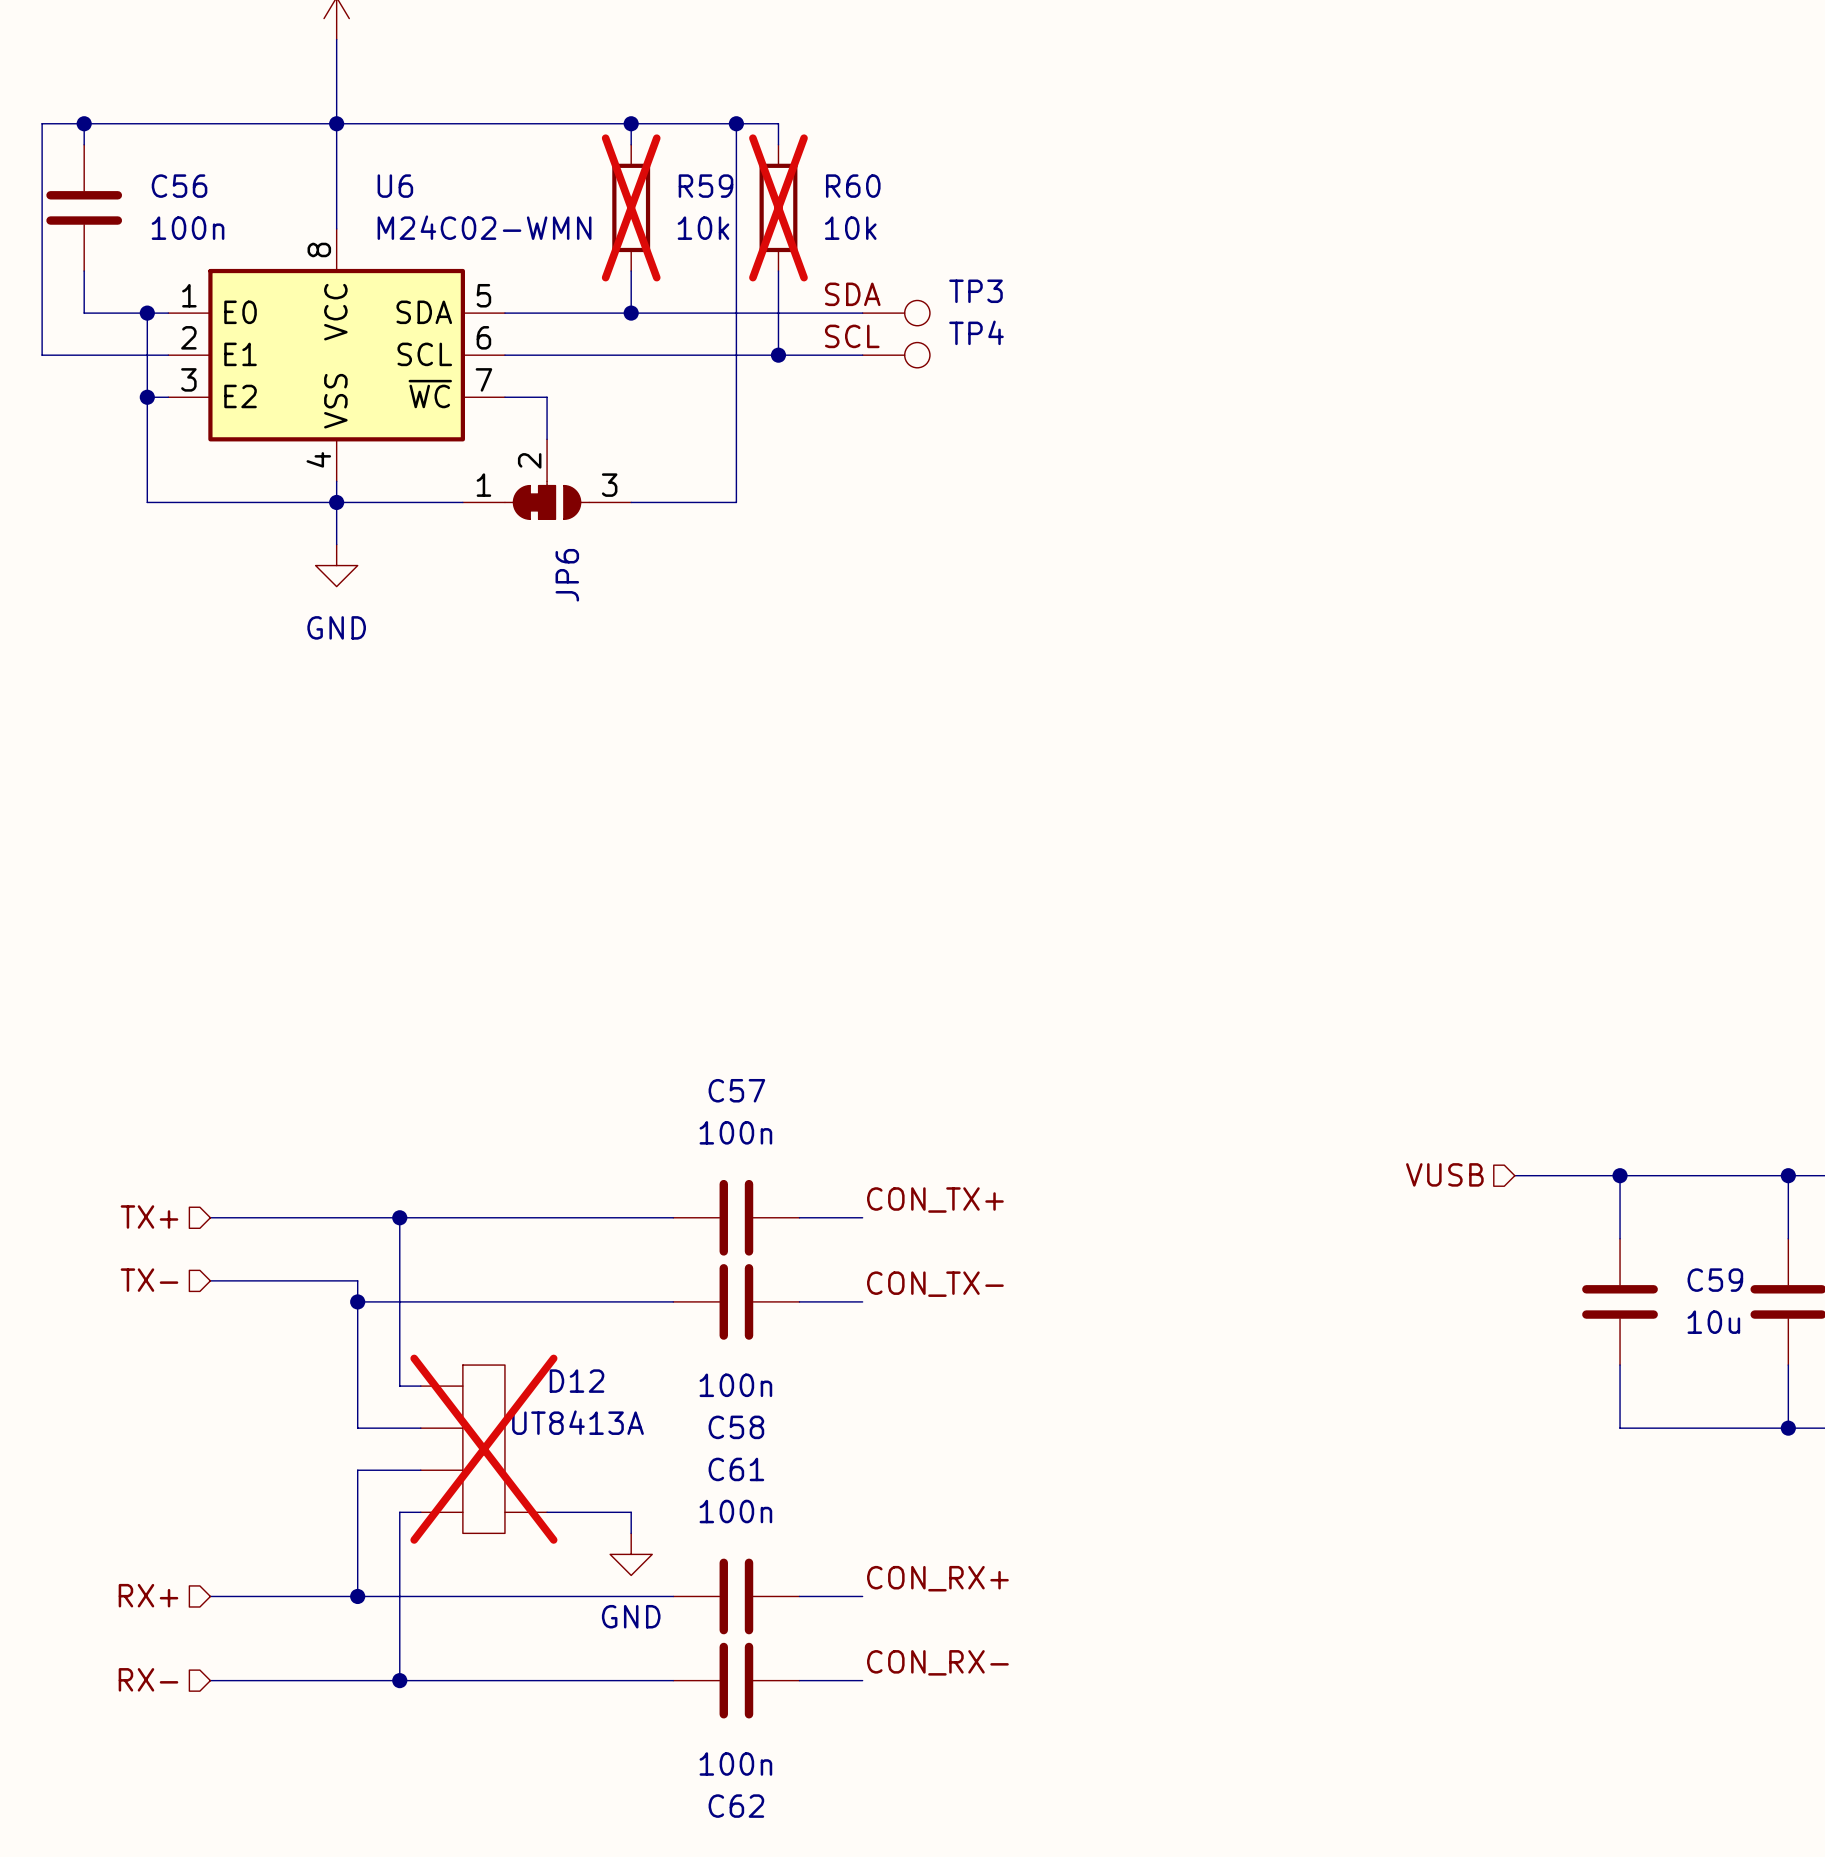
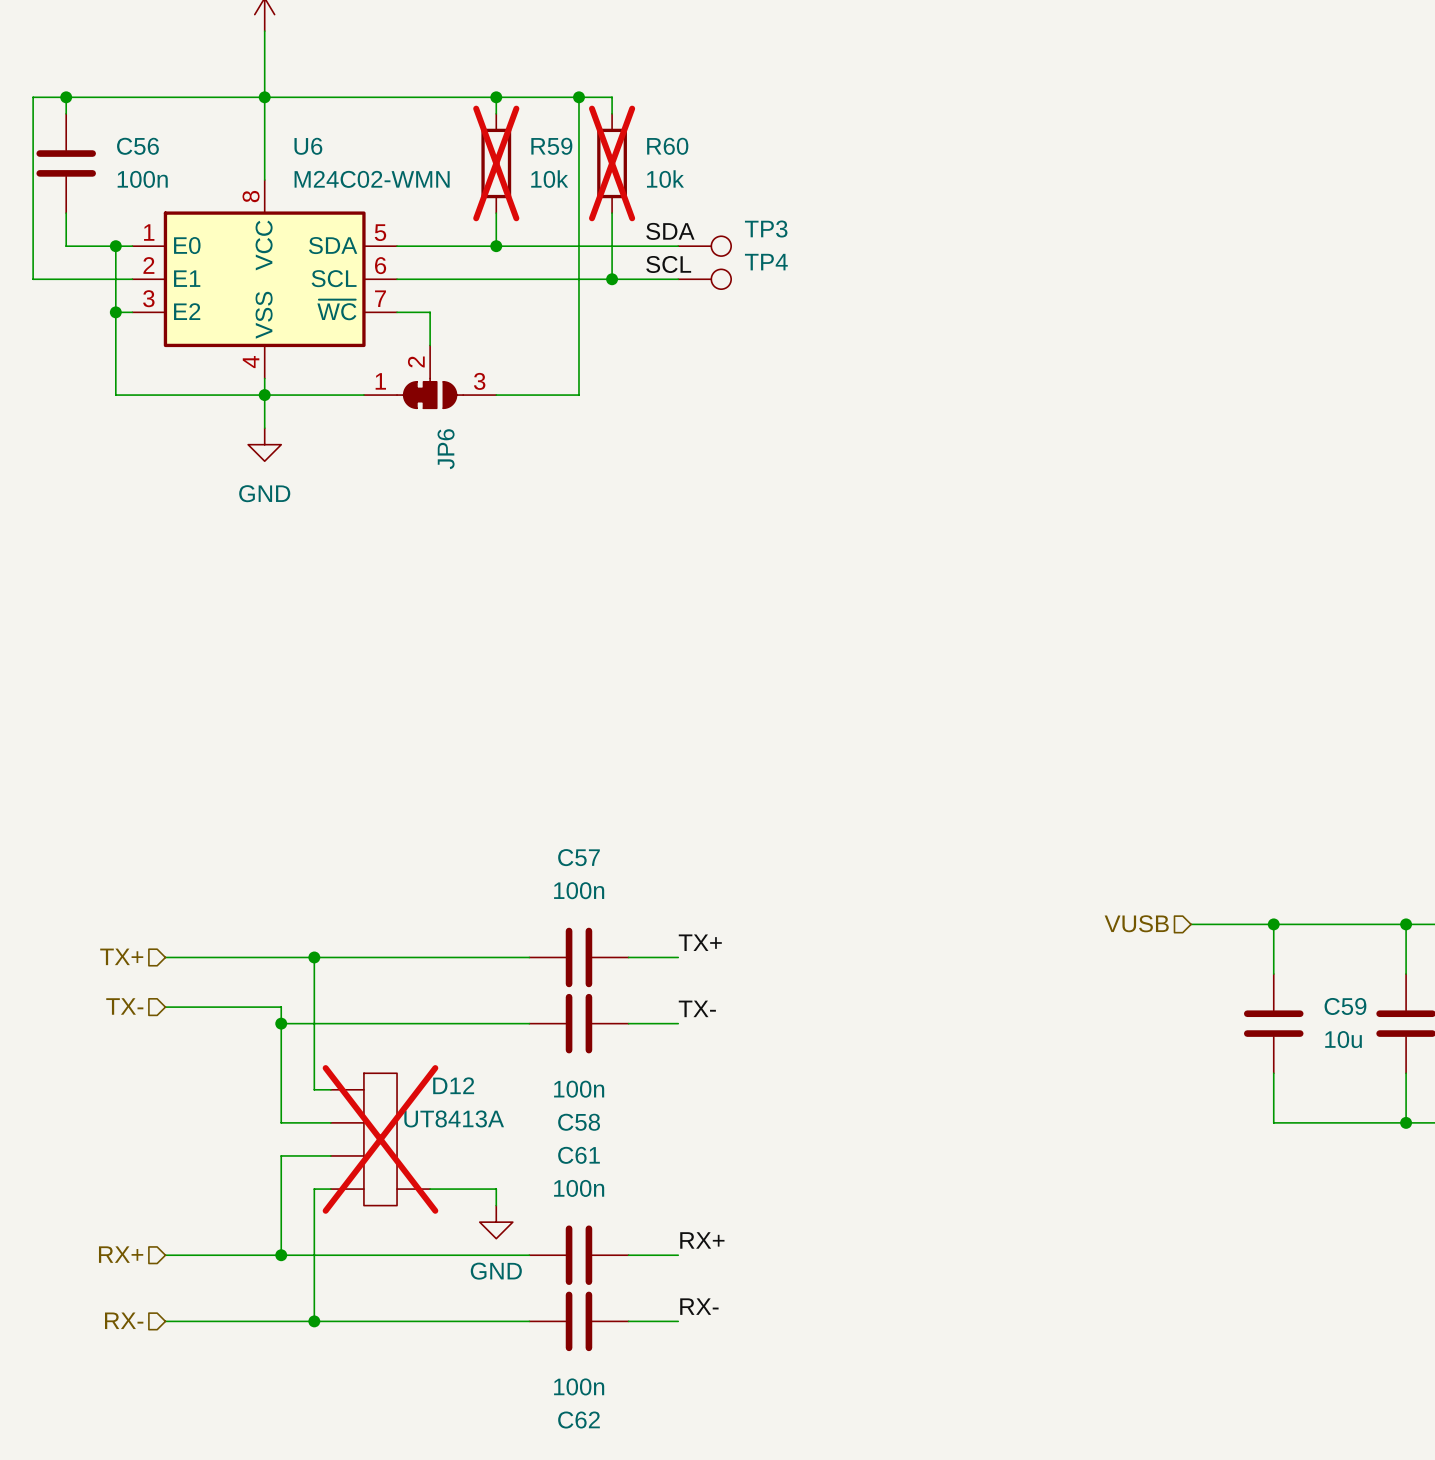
label: CON_TX+ (935, 1200) -> TX+ (700, 942)
label: CON_TX- (935, 1284) -> TX- (697, 1008)
label: CON_RX+ (937, 1578) -> RX+ (702, 1240)
label: CON_RX- (937, 1662) -> RX- (699, 1306)

